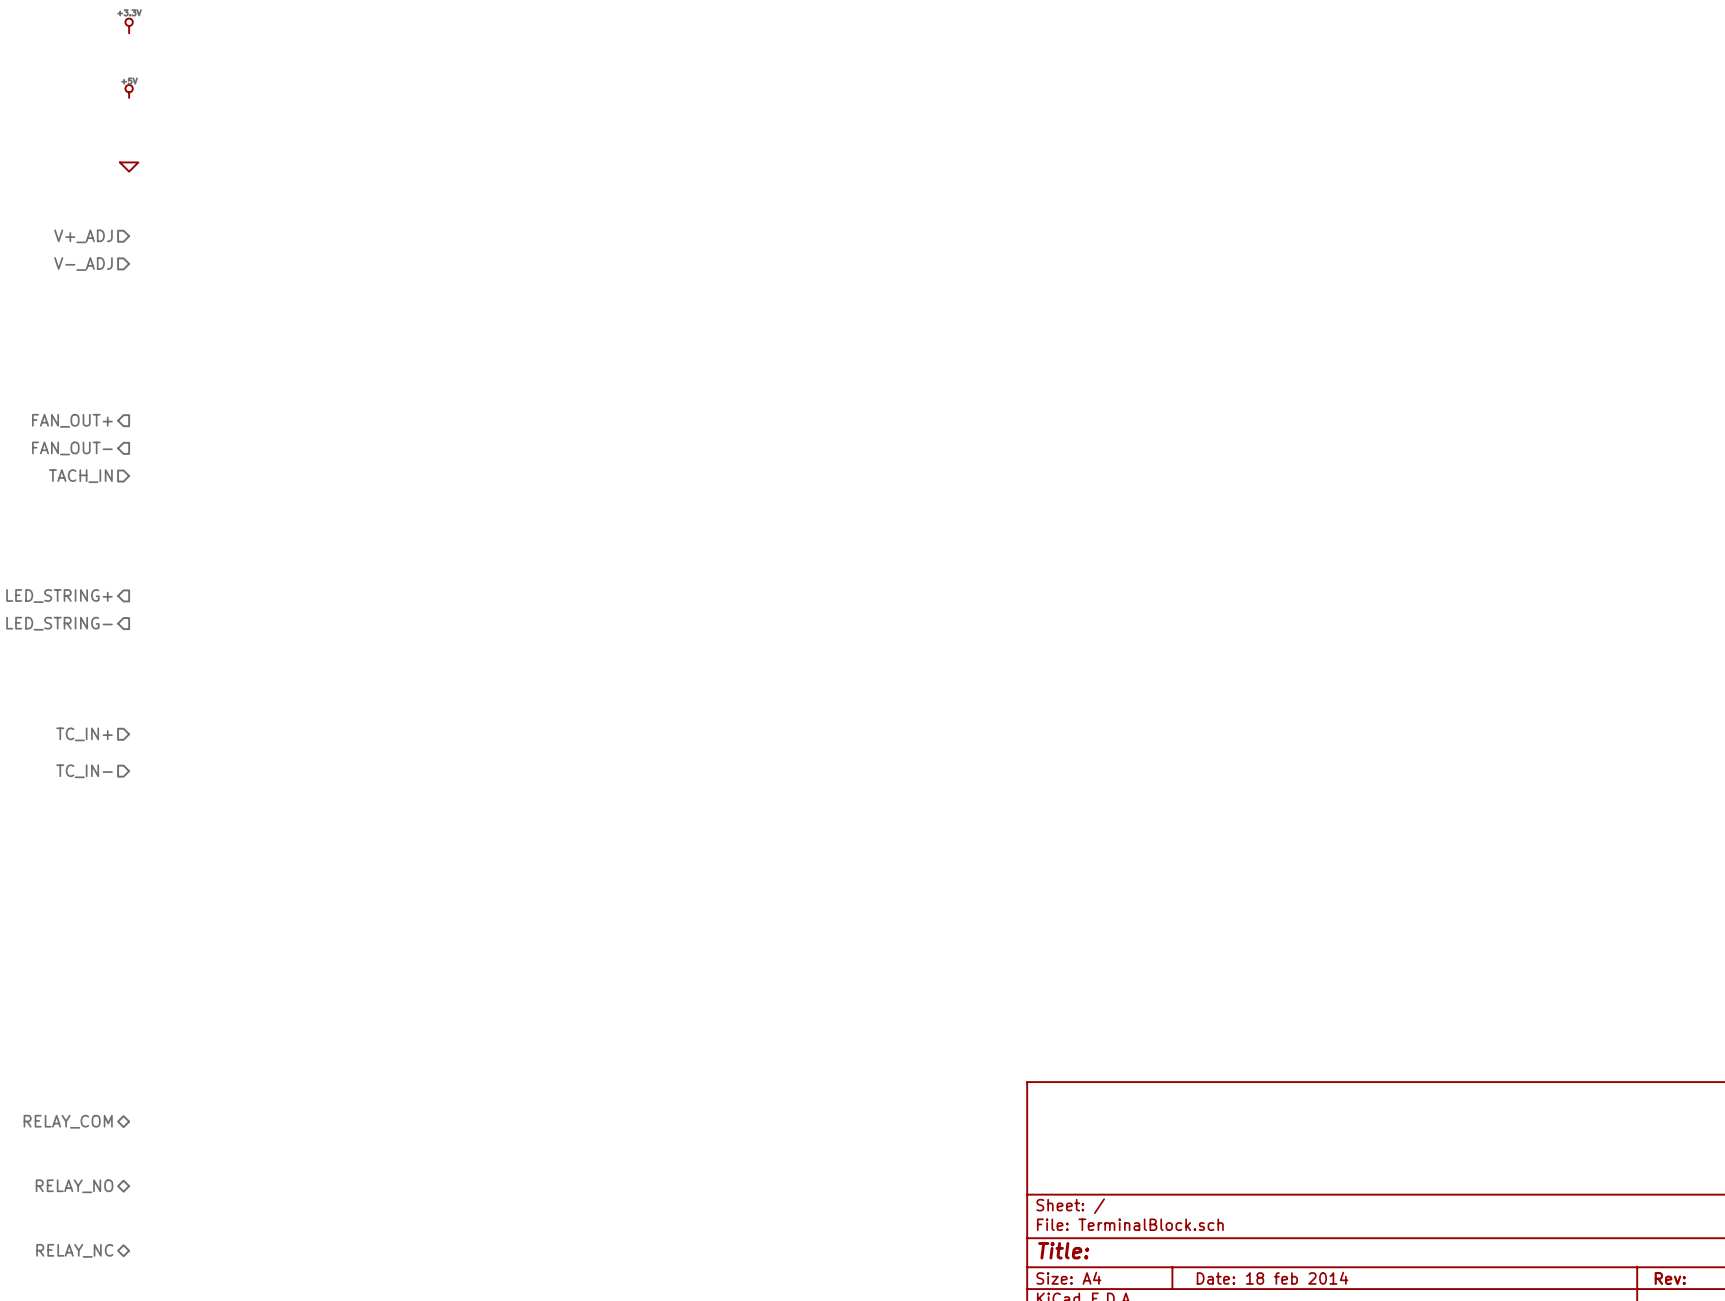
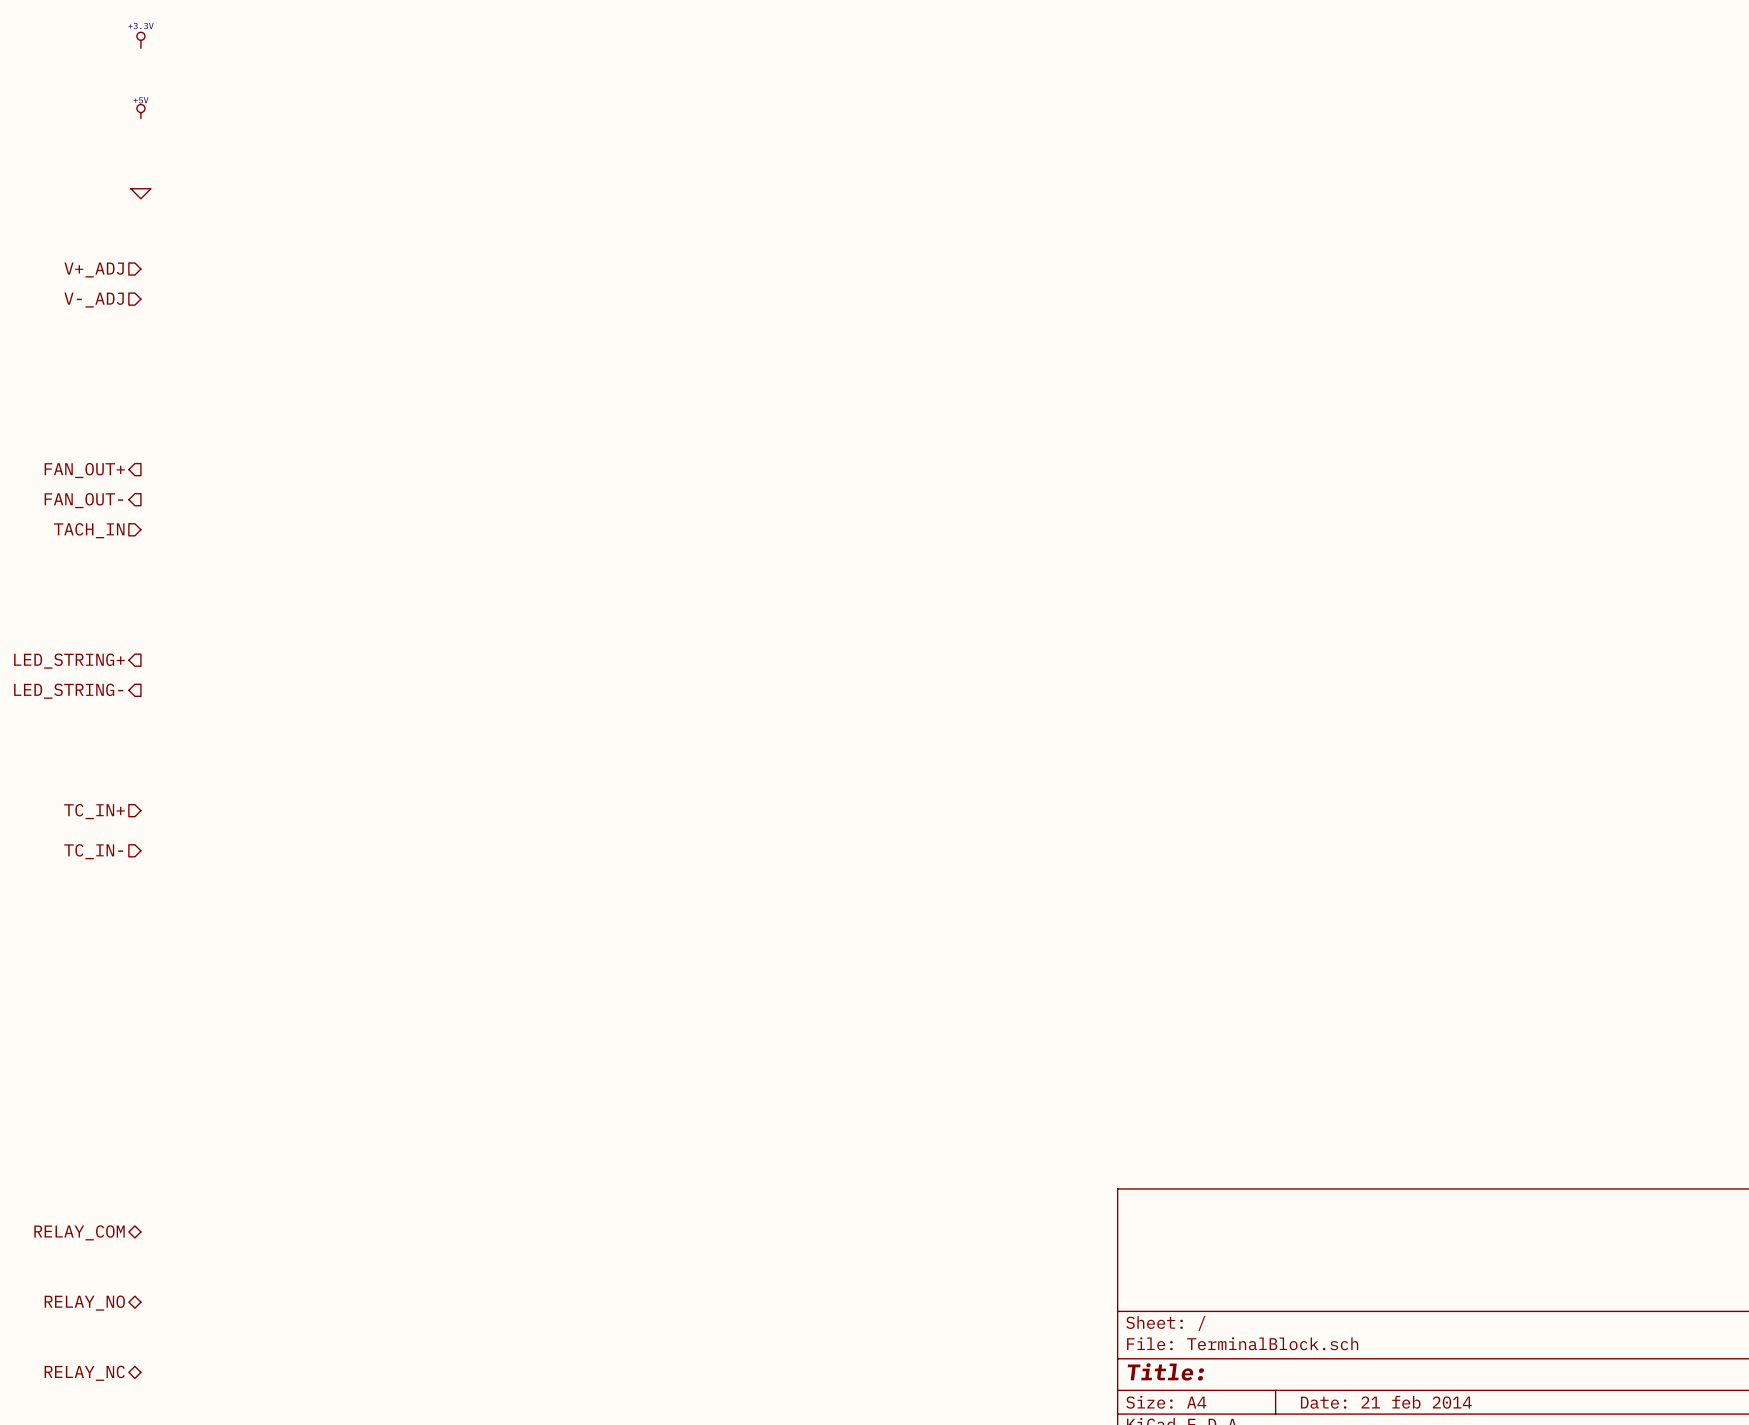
title block: Date: 18 feb 2014 (1272, 1278) -> Date: 21 feb 2014 (1386, 1402)

